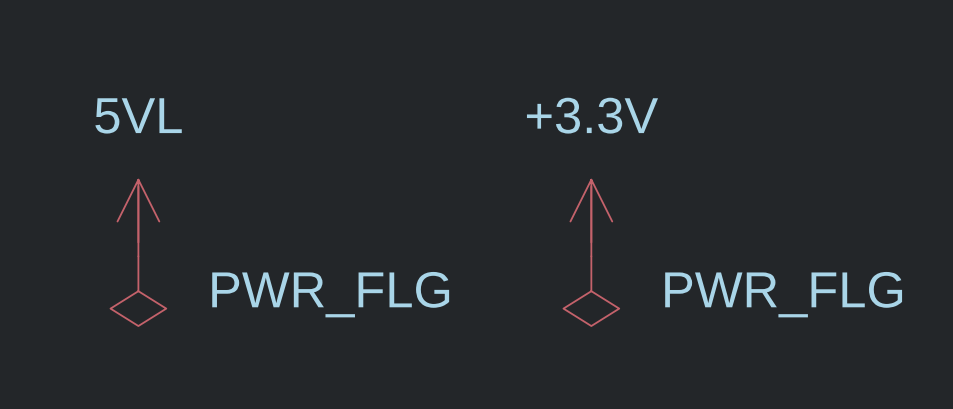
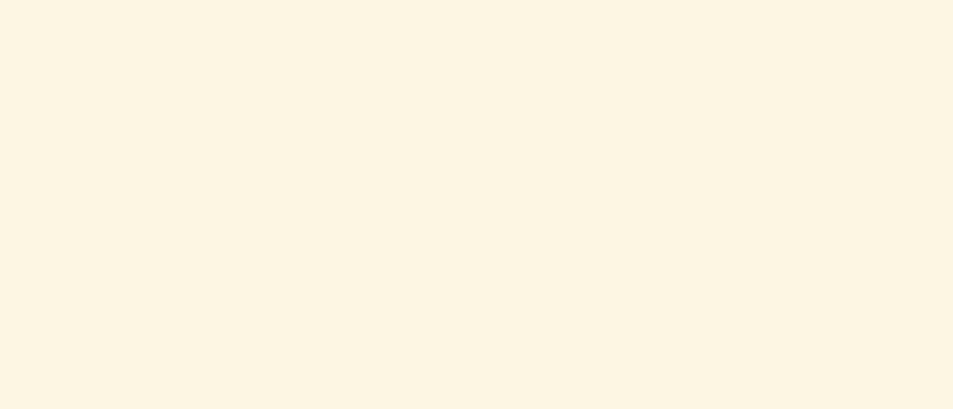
power symbol: 5VL (138, 218) -> none
power symbol: +3.3V (591, 218) -> none
power symbol: PWR_FLG (138, 291) -> none
power symbol: PWR_FLG (591, 291) -> none

